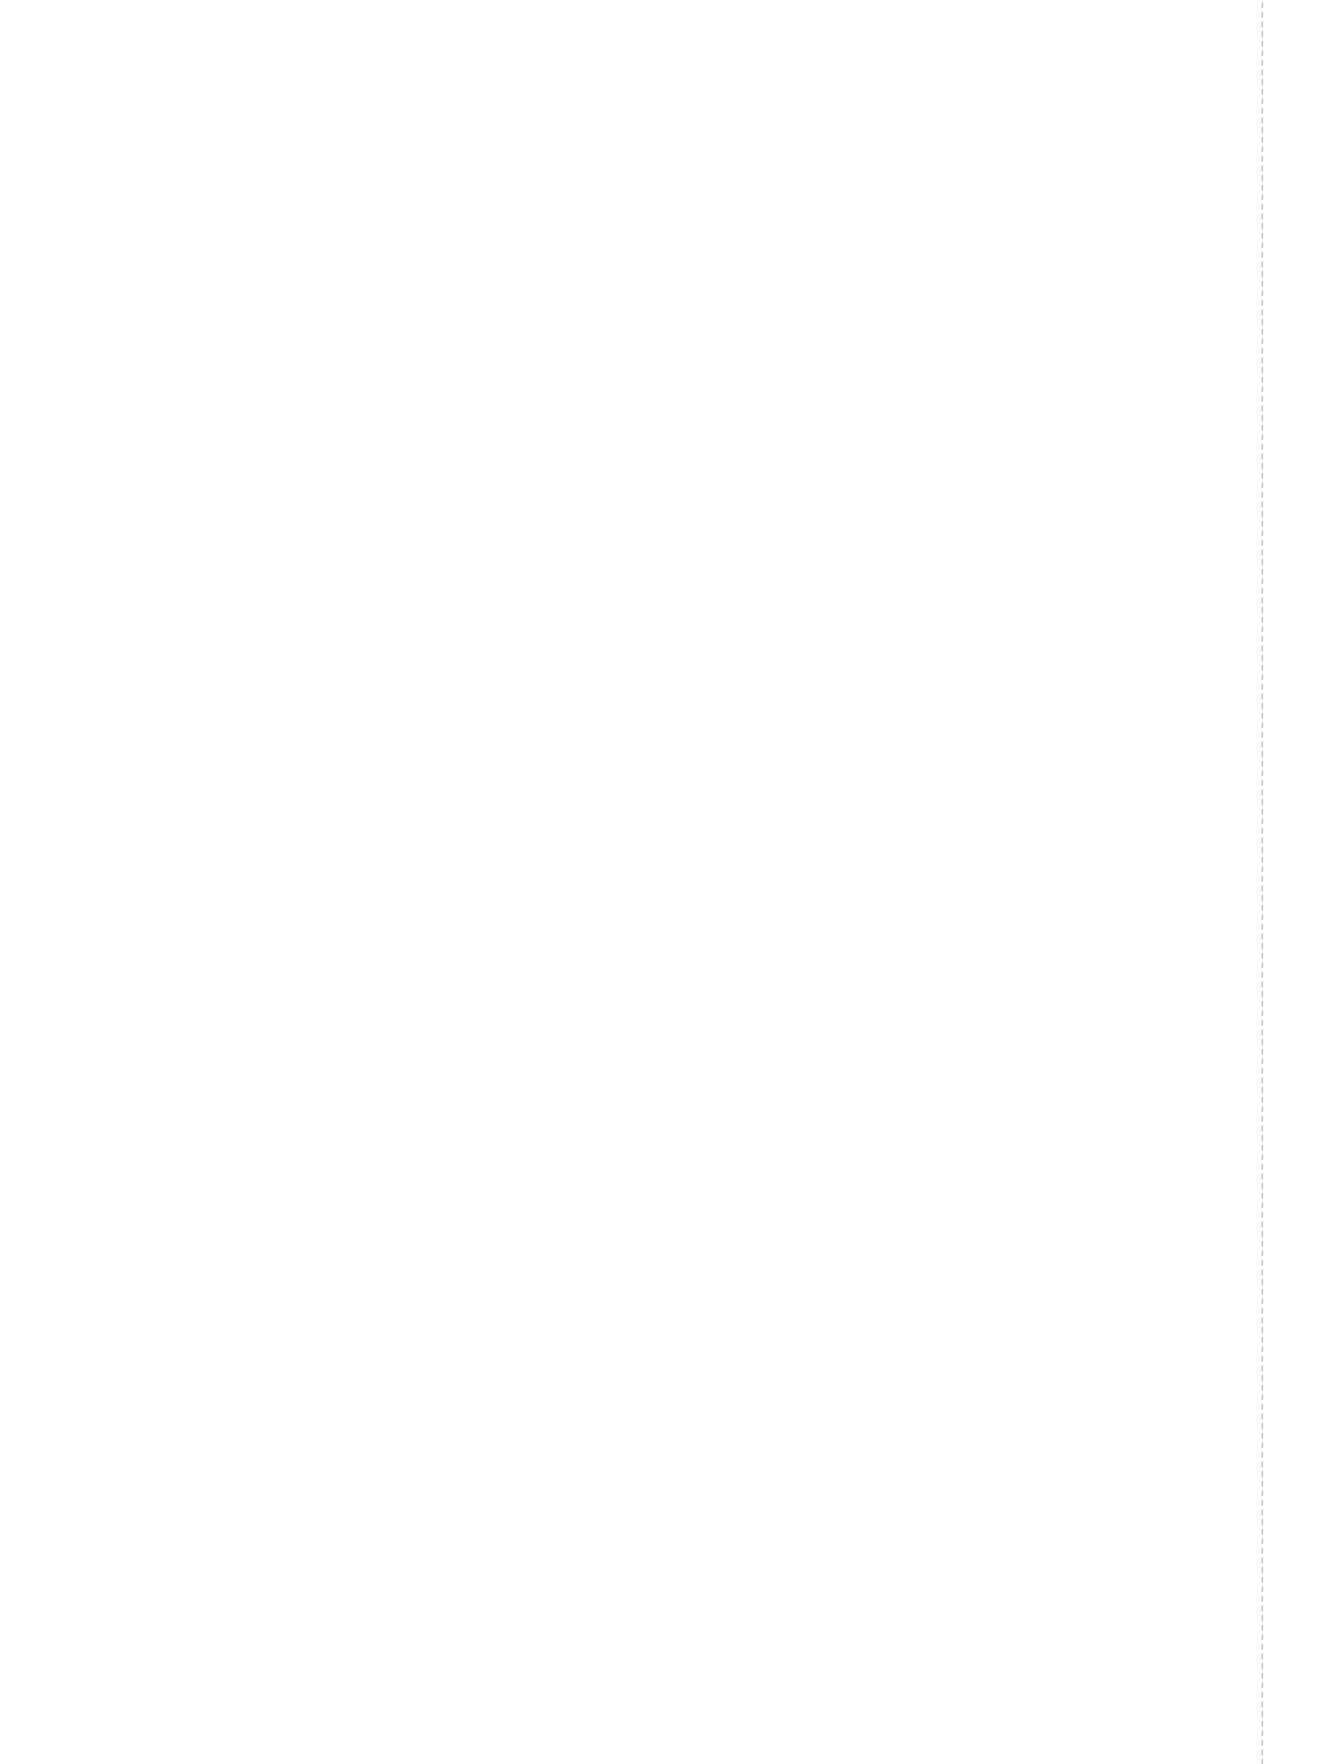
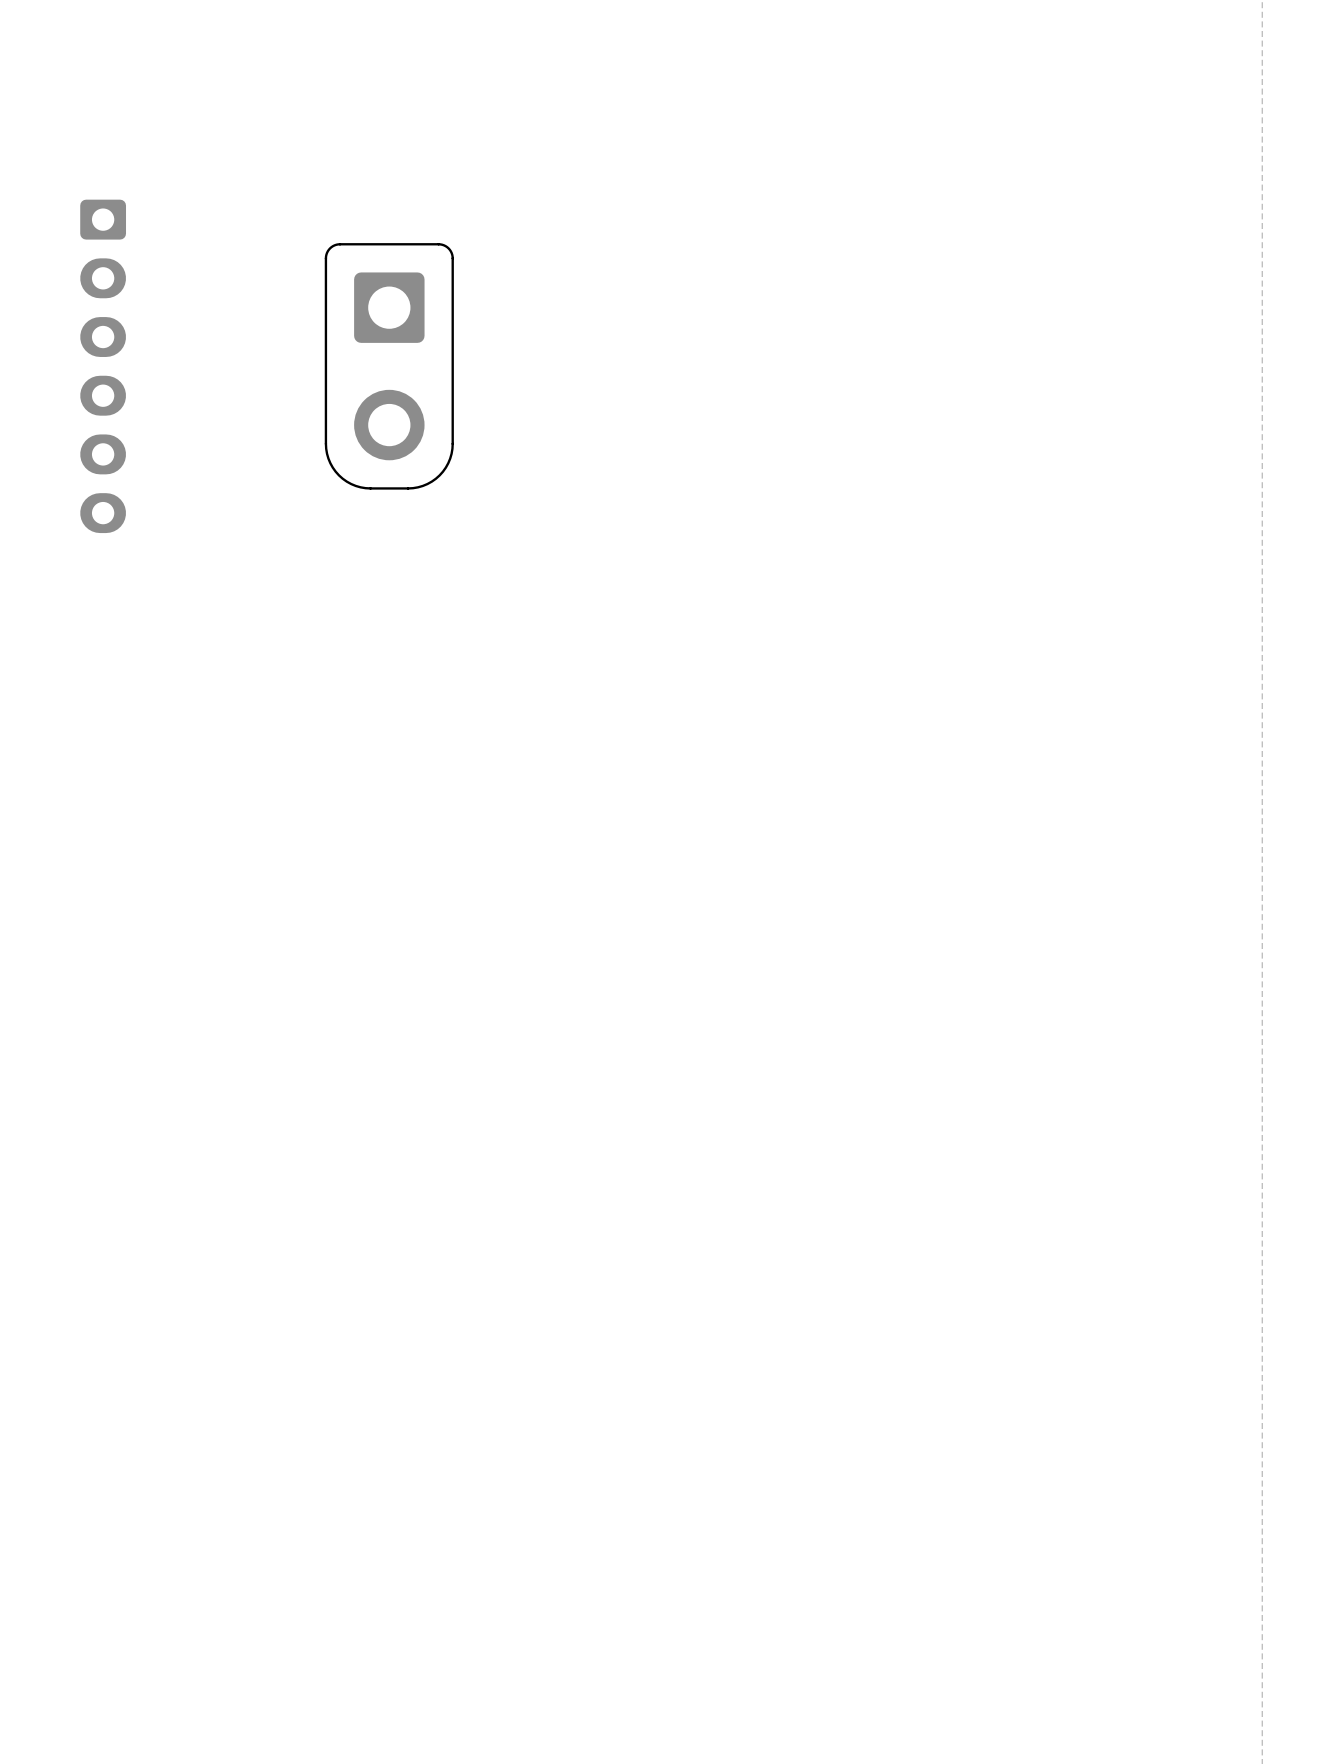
part: none -> (103, 366)
part: none -> (389, 366)

